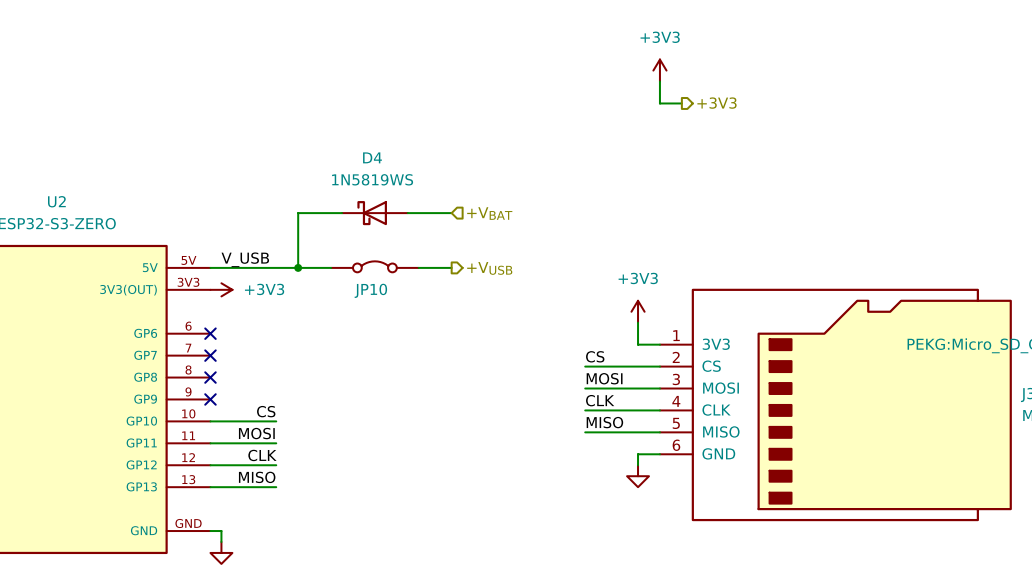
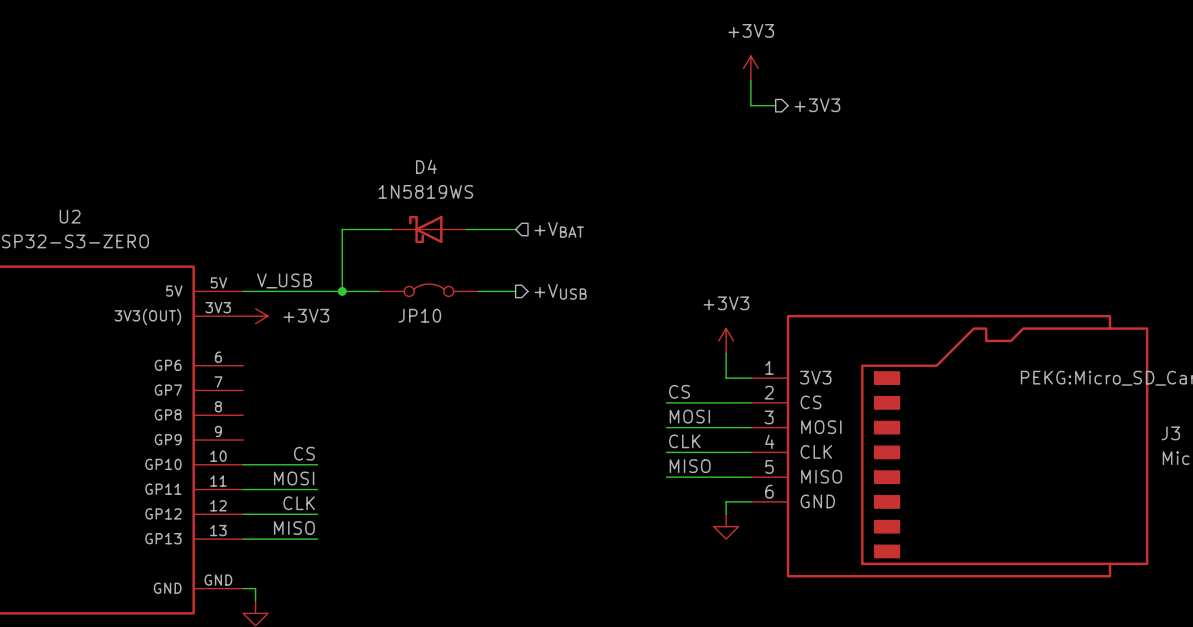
no-connect mark: (210, 333) -> none
no-connect mark: (210, 355) -> none
no-connect mark: (210, 377) -> none
no-connect mark: (210, 399) -> none

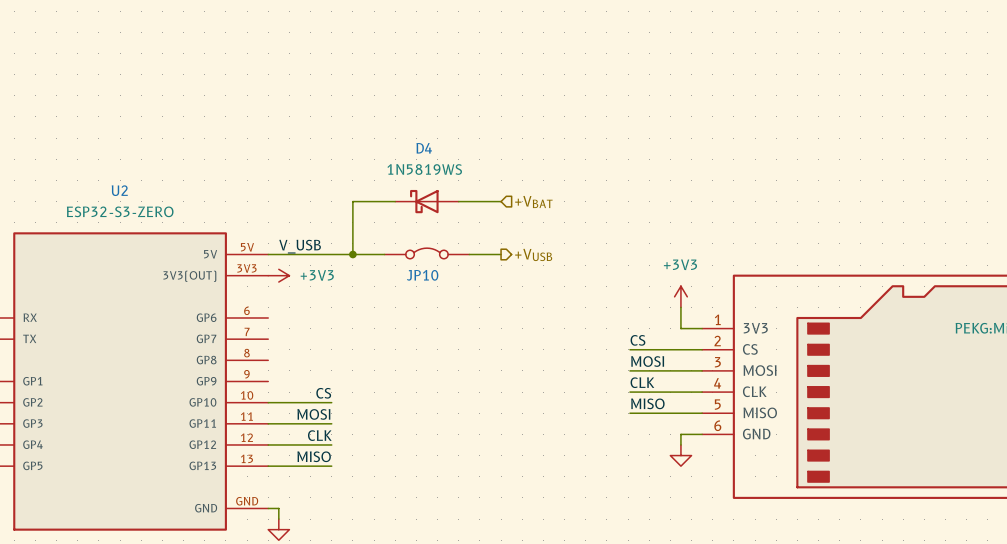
power symbol: +3V3 (750, 68) -> none
wire: (750, 80) (750, 105) (775, 105) -> none
hierarchical label: +3V3 (817, 105) -> none

